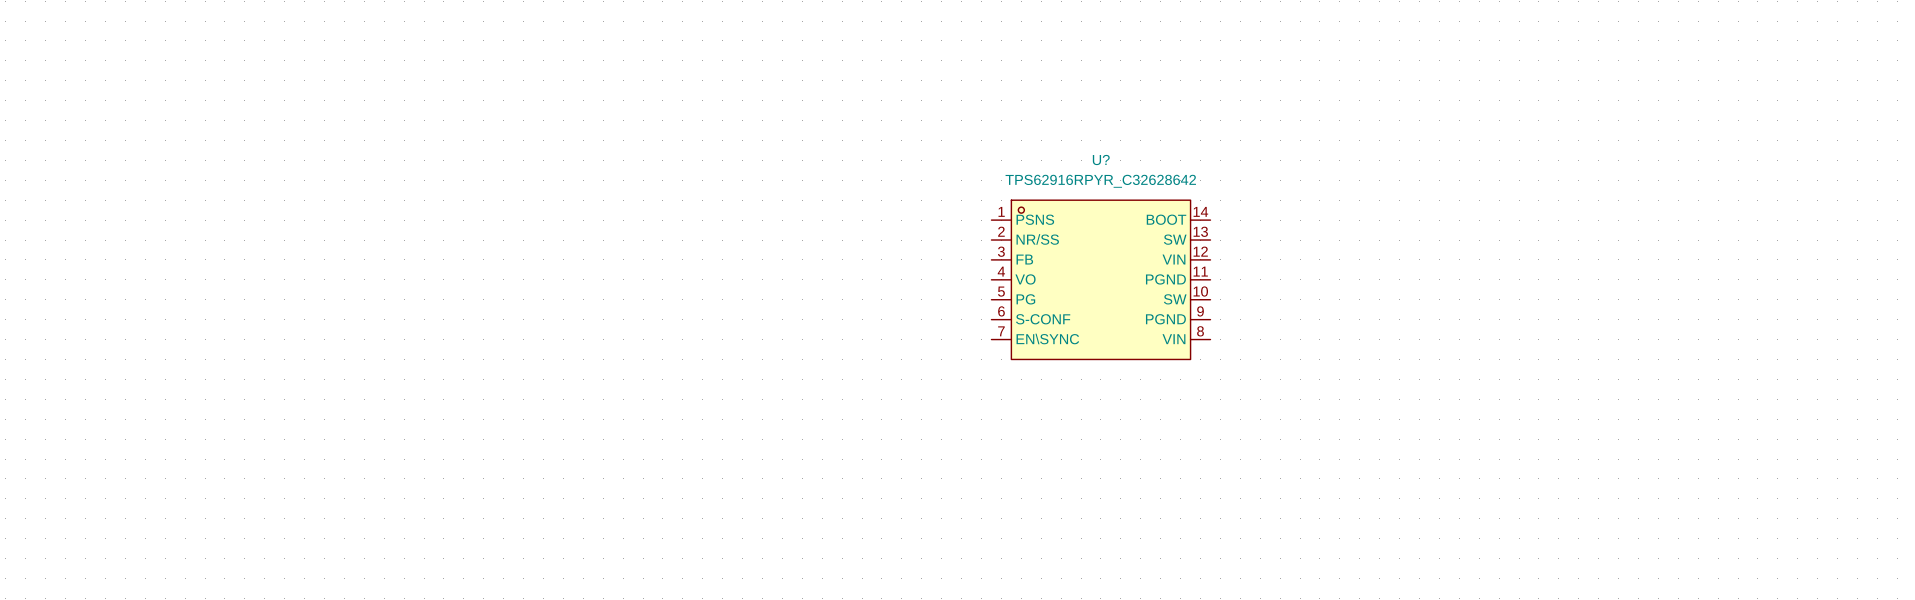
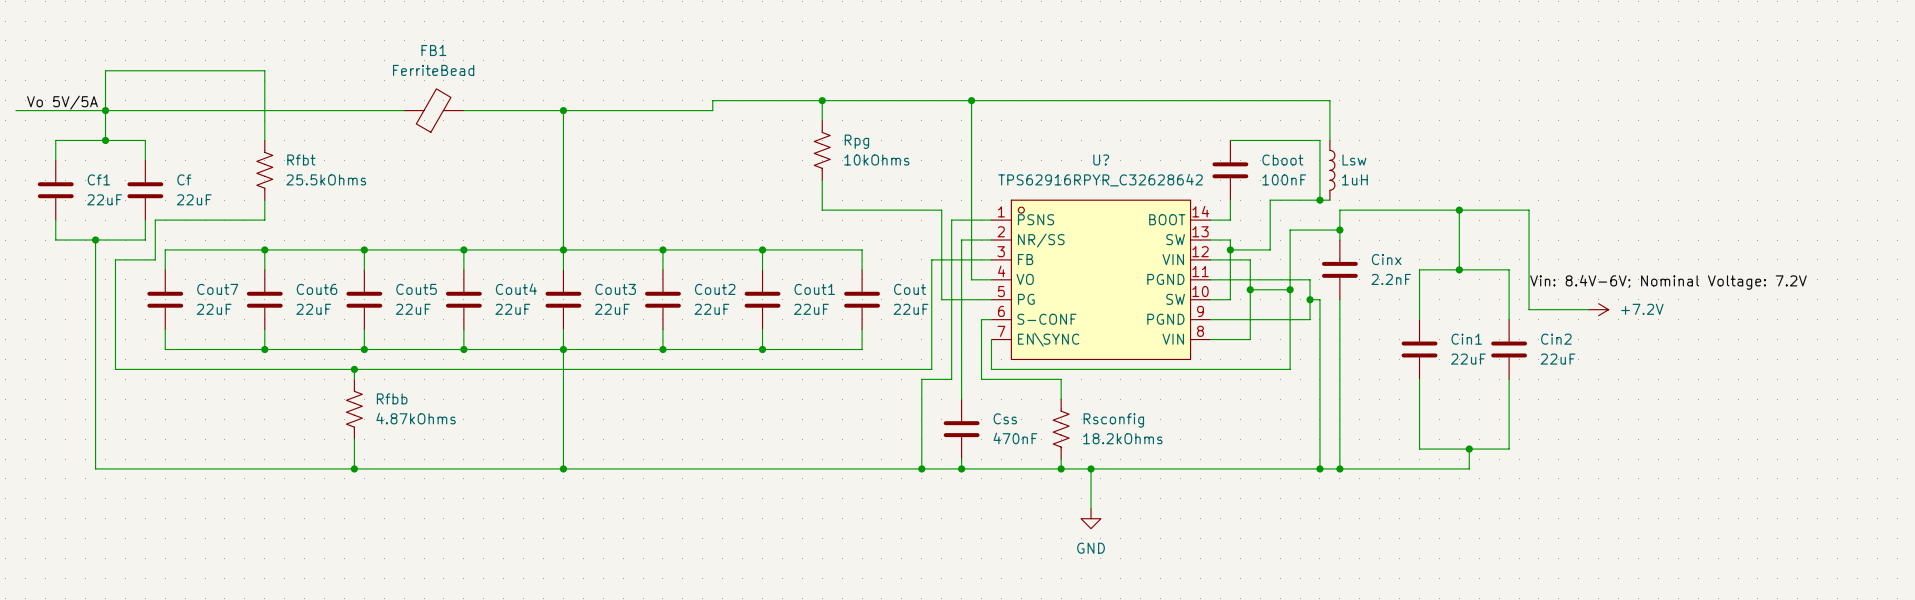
wire: none -> (822, 100) (822, 120)
junction: none -> (822, 100)
wire: none -> (971, 100) (971, 279) (991, 279)
junction: none -> (971, 100)
label: none -> Vo 5V/5A (62, 102)
wire: none -> (15, 110) (404, 110)
junction: none -> (105, 110)
FB1: none -> FerriteBead (434, 110)
wire: none -> (463, 110) (712, 110) (712, 100) (1329, 100) (1329, 140)
wire: none -> (563, 110) (563, 269)
junction: none -> (563, 110)
wire: none -> (105, 140) (105, 70) (264, 70) (264, 140)
junction: none -> (105, 140)
wire: none -> (1230, 140) (1319, 140) (1319, 200)
Rpg: none -> 10kOhms (822, 150)
wire: none -> (55, 160) (55, 140) (145, 140) (145, 160)
Rfbt: none -> 25.5kOhms (264, 170)
Cboot: none -> 100nF (1230, 170)
Lsw: none -> 1uH (1332, 170)
wire: none -> (822, 180) (822, 210) (941, 210) (941, 299) (991, 299)
Cf1: none -> 22uF (55, 190)
Cf: none -> 22uF (145, 190)
wire: none -> (264, 200) (264, 220) (155, 220) (155, 259) (115, 259) (115, 369) (931, 369) (931, 259) (991, 259)
wire: none -> (1230, 200) (1230, 220) (1210, 220)
junction: none -> (1319, 200)
wire: none -> (1329, 200) (1270, 200) (1270, 249) (1230, 249)
wire: none -> (1459, 210) (1459, 269)
junction: none -> (1459, 210)
wire: none -> (55, 220) (55, 240) (145, 240) (145, 220)
wire: none -> (991, 220) (951, 220) (951, 379) (921, 379) (921, 468)
wire: none -> (1339, 230) (1290, 230) (1290, 369) (991, 369) (991, 339)
junction: none -> (1339, 230)
wire: none -> (95, 240) (95, 468) (1469, 468) (1469, 449)
junction: none -> (95, 240)
wire: none -> (991, 240) (961, 240) (961, 399)
wire: none -> (1210, 240) (1230, 240) (1230, 299) (1210, 299)
wire: none -> (1339, 240) (1339, 210) (1529, 210) (1529, 309) (1588, 309)
wire: none -> (264, 249) (264, 269)
junction: none -> (264, 249)
wire: none -> (364, 249) (364, 269)
junction: none -> (364, 249)
wire: none -> (463, 249) (463, 269)
junction: none -> (463, 249)
junction: none -> (563, 249)
wire: none -> (662, 249) (662, 269)
junction: none -> (662, 249)
wire: none -> (762, 249) (762, 269)
junction: none -> (762, 249)
junction: none -> (1230, 249)
wire: none -> (1210, 259) (1250, 259) (1250, 339) (1210, 339)
wire: none -> (165, 269) (165, 249) (862, 249) (862, 269)
Cinx: none -> 2.2nF (1339, 269)
junction: none -> (1459, 269)
wire: none -> (1210, 279) (1310, 279) (1310, 319) (1210, 319)
label: none -> Vin: 8.4V-6V; Nominal Voltage: 7.2V (1668, 282)
wire: none -> (1250, 289) (1290, 289)
junction: none -> (1250, 289)
junction: none -> (1290, 289)
Cout7: none -> 22uF (165, 299)
Cout6: none -> 22uF (264, 299)
Cout5: none -> 22uF (364, 299)
Cout4: none -> 22uF (463, 299)
Cout3: none -> 22uF (563, 299)
Cout2: none -> 22uF (662, 299)
Cout1: none -> 22uF (762, 299)
Cout: none -> 22uF (862, 299)
wire: none -> (1310, 299) (1319, 299) (1319, 468)
junction: none -> (1310, 299)
wire: none -> (1339, 299) (1339, 468)
power symbol: none -> +7.2V (1598, 309)
wire: none -> (991, 319) (981, 319) (981, 379) (1061, 379) (1061, 399)
wire: none -> (1419, 319) (1419, 269) (1509, 269) (1509, 319)
wire: none -> (165, 329) (165, 349) (862, 349) (862, 329)
wire: none -> (264, 329) (264, 349)
wire: none -> (364, 329) (364, 349)
wire: none -> (463, 329) (463, 349)
wire: none -> (563, 329) (563, 468)
wire: none -> (662, 329) (662, 349)
wire: none -> (762, 329) (762, 349)
junction: none -> (264, 349)
junction: none -> (364, 349)
junction: none -> (463, 349)
junction: none -> (563, 349)
junction: none -> (662, 349)
junction: none -> (762, 349)
Cin1: none -> 22uF (1419, 349)
Cin2: none -> 22uF (1509, 349)
wire: none -> (354, 369) (354, 379)
junction: none -> (354, 369)
wire: none -> (1419, 379) (1419, 449) (1509, 449) (1509, 379)
Rfbb: none -> 4.87kOhms (354, 409)
Css: none -> 470nF (961, 429)
Rsconfig: none -> 18.2kOhms (1061, 429)
wire: none -> (354, 439) (354, 468)
junction: none -> (1469, 449)
wire: none -> (961, 459) (961, 468)
wire: none -> (1061, 459) (1061, 468)
junction: none -> (354, 468)
junction: none -> (563, 468)
junction: none -> (921, 468)
junction: none -> (961, 468)
junction: none -> (1061, 468)
wire: none -> (1091, 468) (1091, 508)
junction: none -> (1091, 468)
junction: none -> (1319, 468)
junction: none -> (1339, 468)
power symbol: none -> GND (1091, 518)

